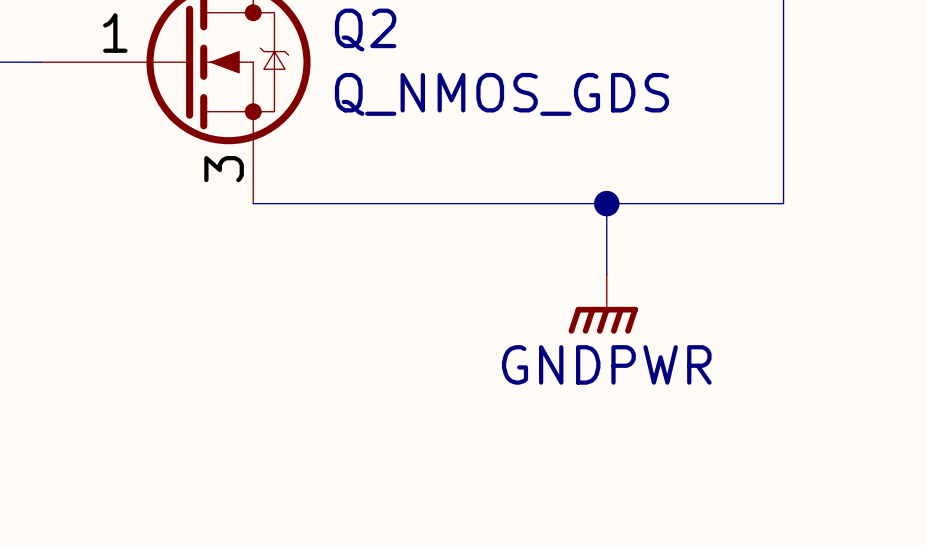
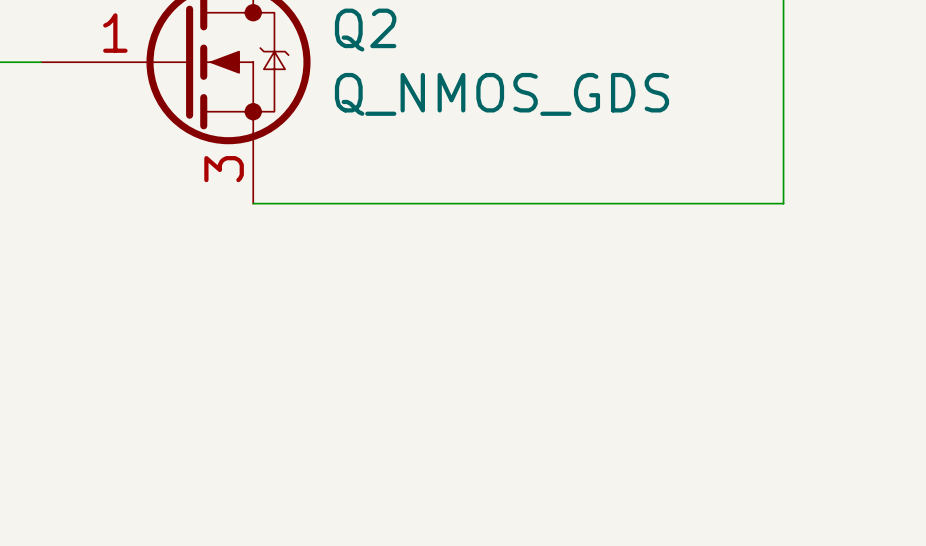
wire: (606, 203) (606, 274) -> none
junction: (606, 203) -> none
power symbol: GNDPWR (603, 304) -> none

